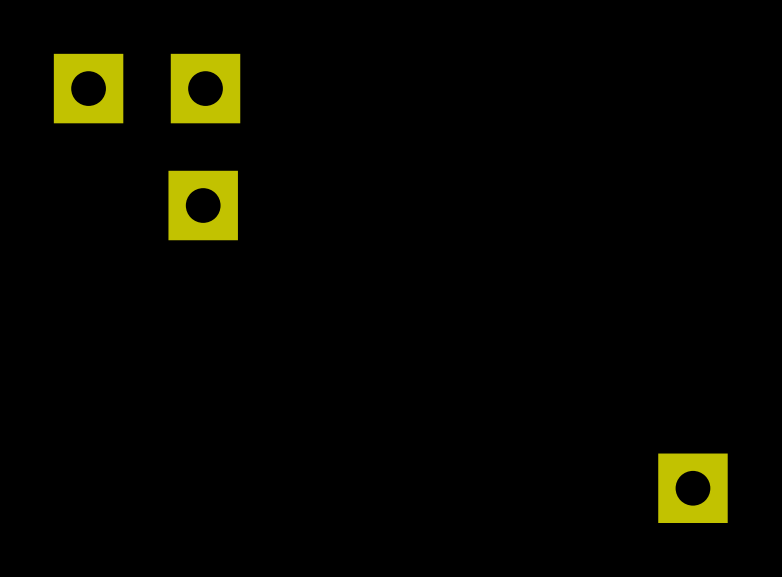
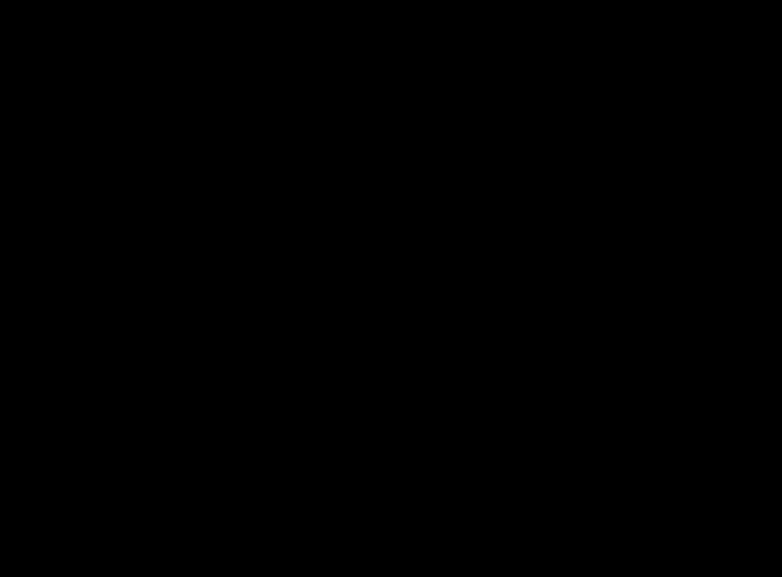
part: (88, 88) -> none
part: (205, 88) -> none
part: (203, 205) -> none
part: (692, 488) -> none

